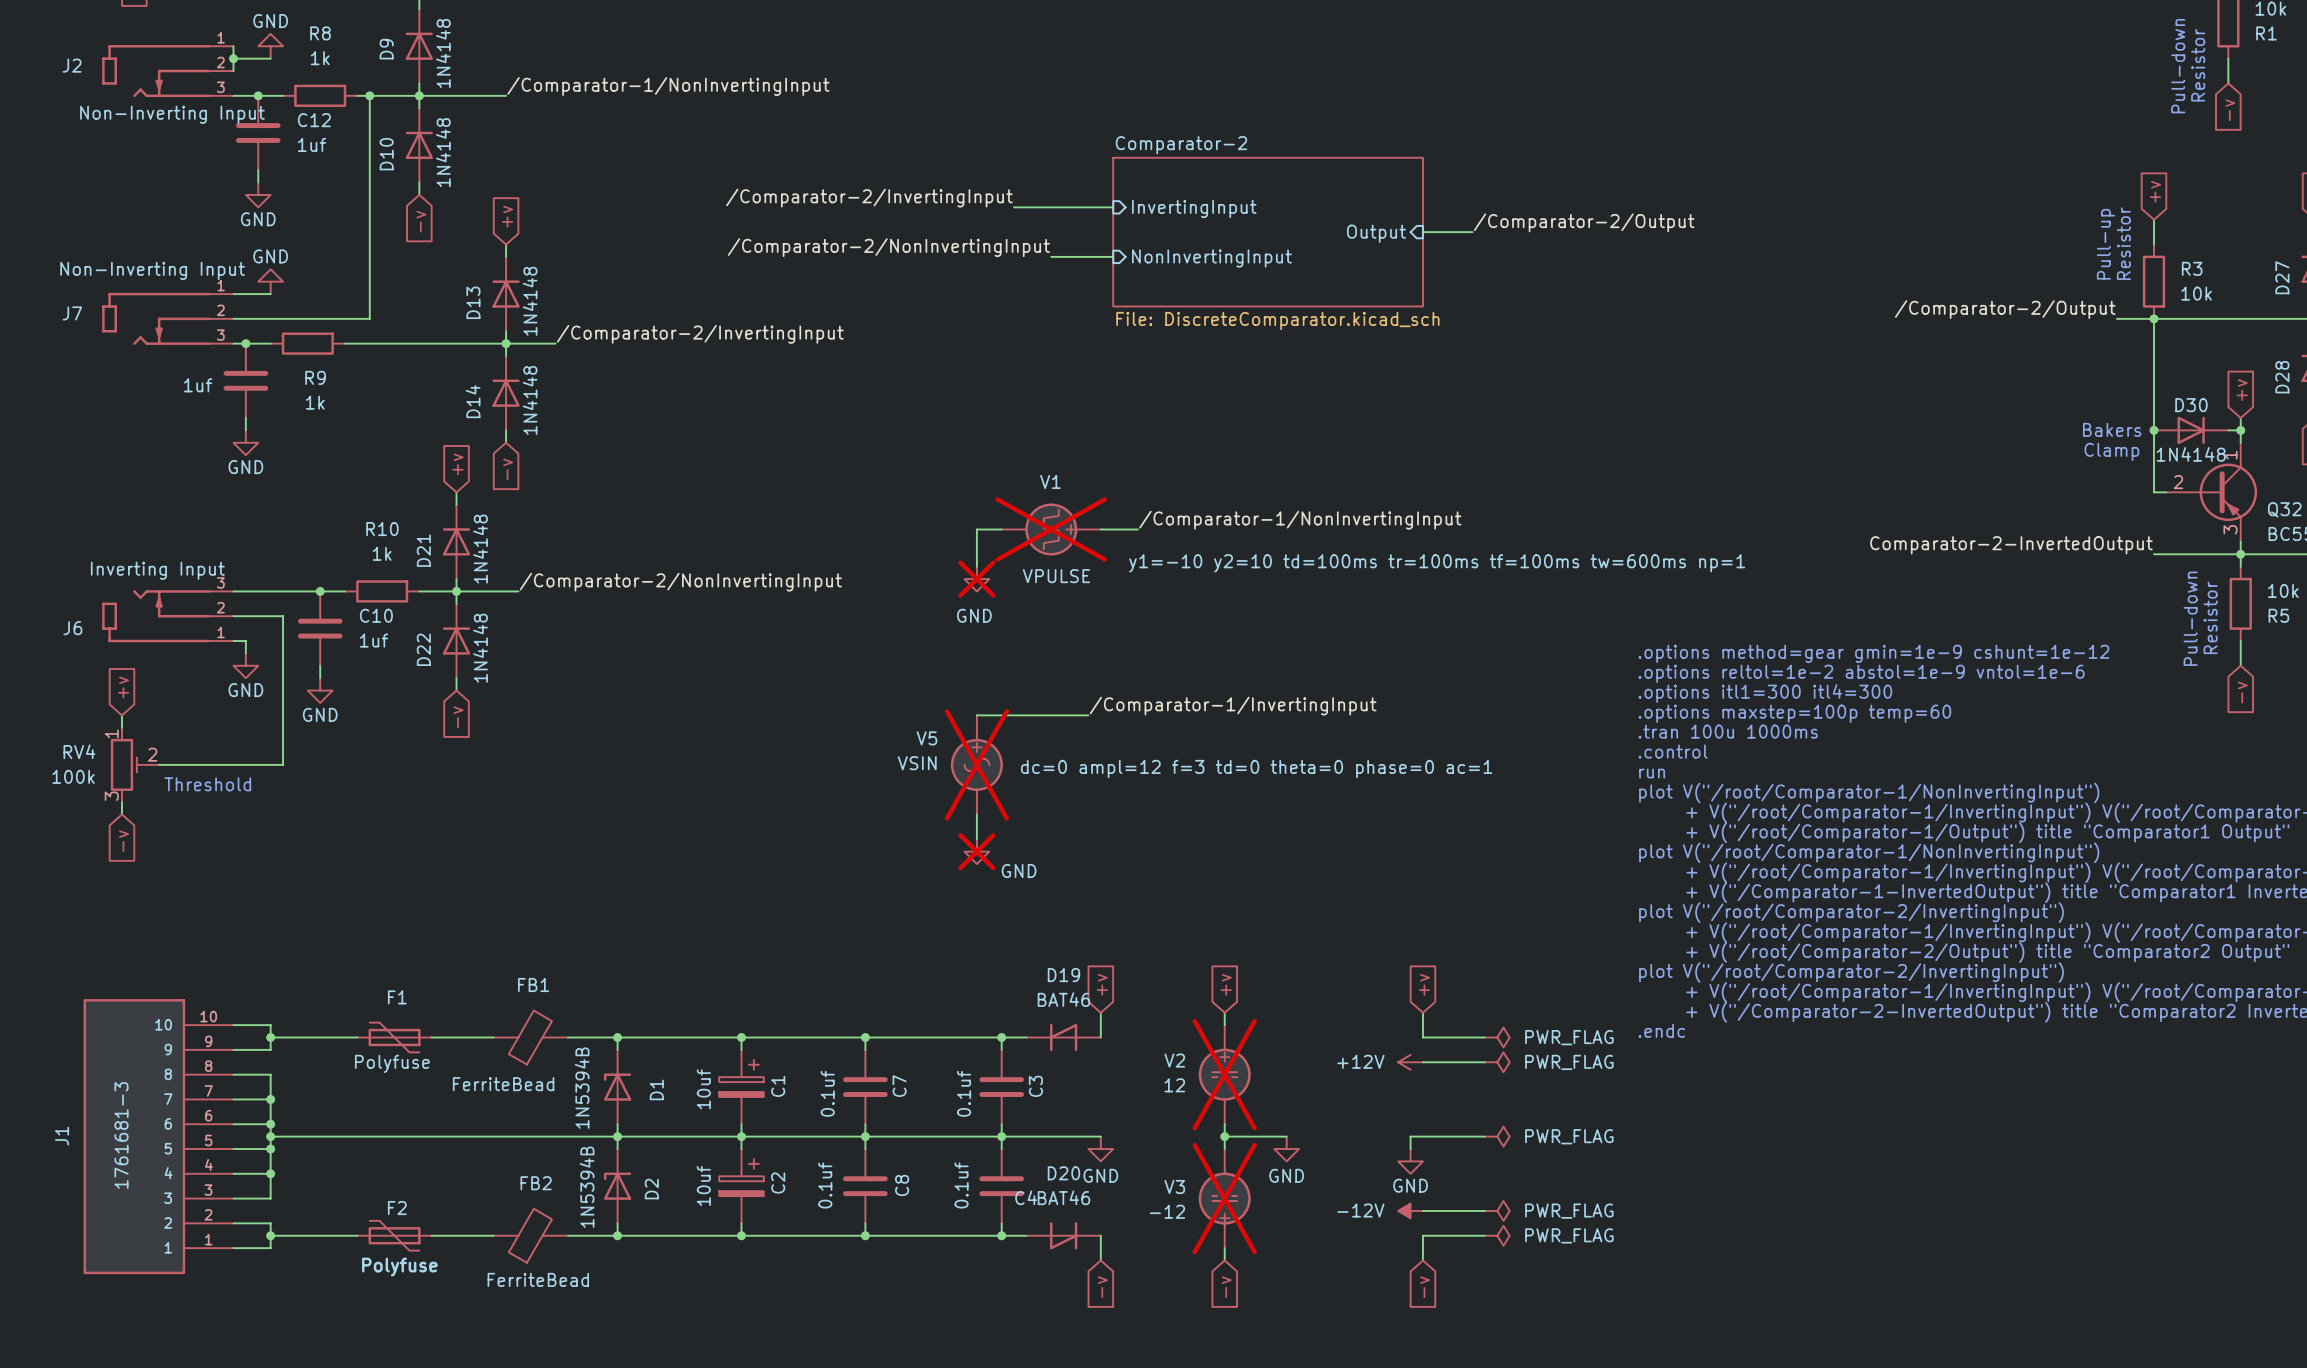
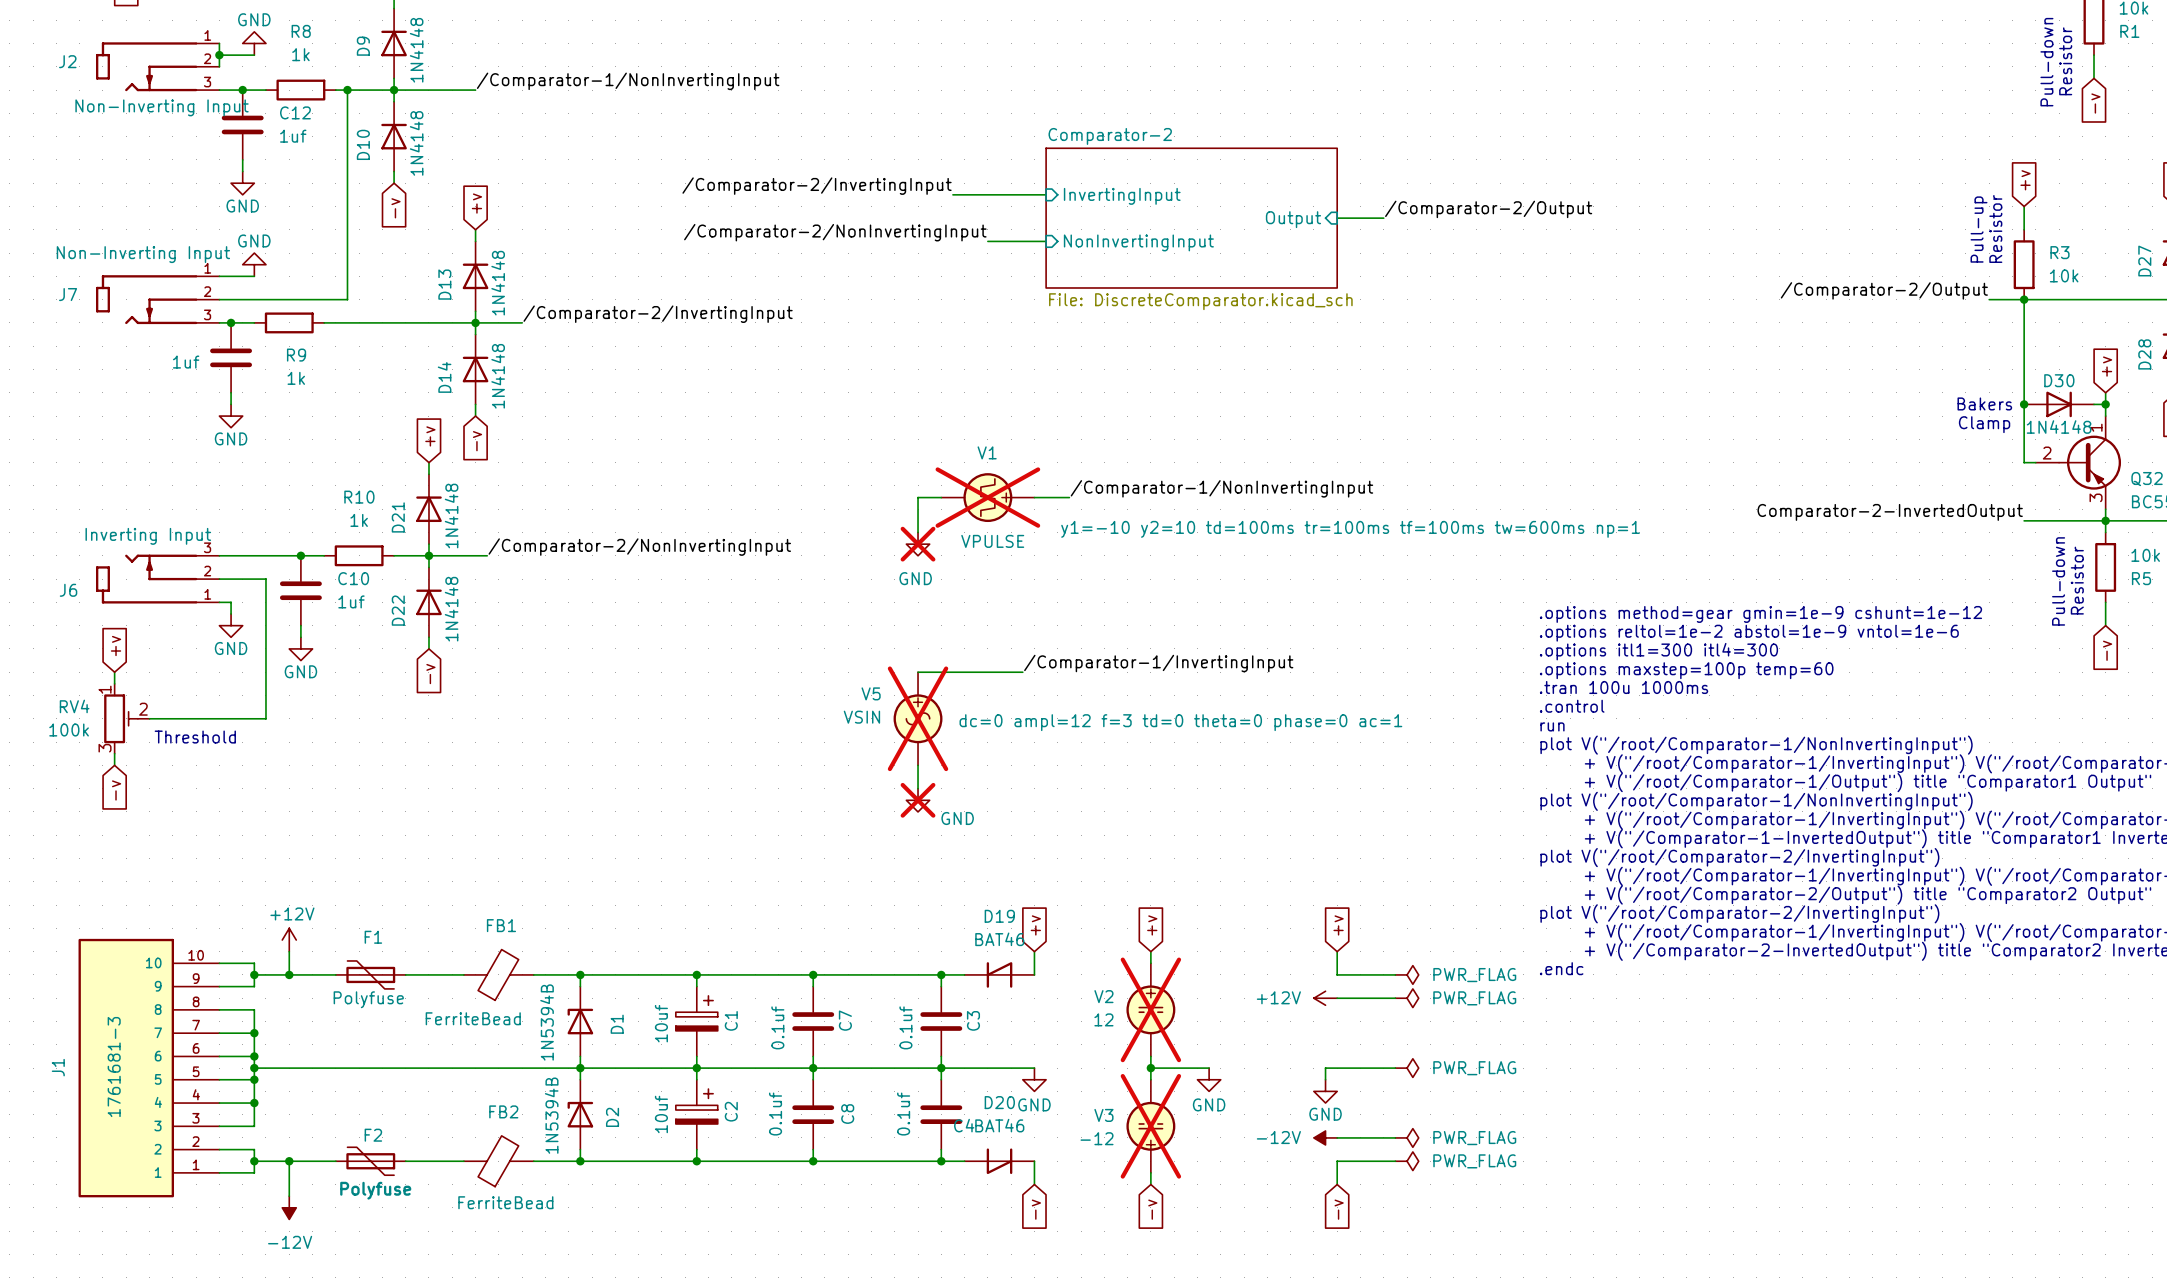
power symbol: none -> +12V (289, 940)
wire: none -> (289, 951) (289, 974)
junction: none -> (289, 974)
wire: none -> (289, 1161) (289, 1196)
junction: none -> (289, 1161)
power symbol: none -> -12V (289, 1207)

